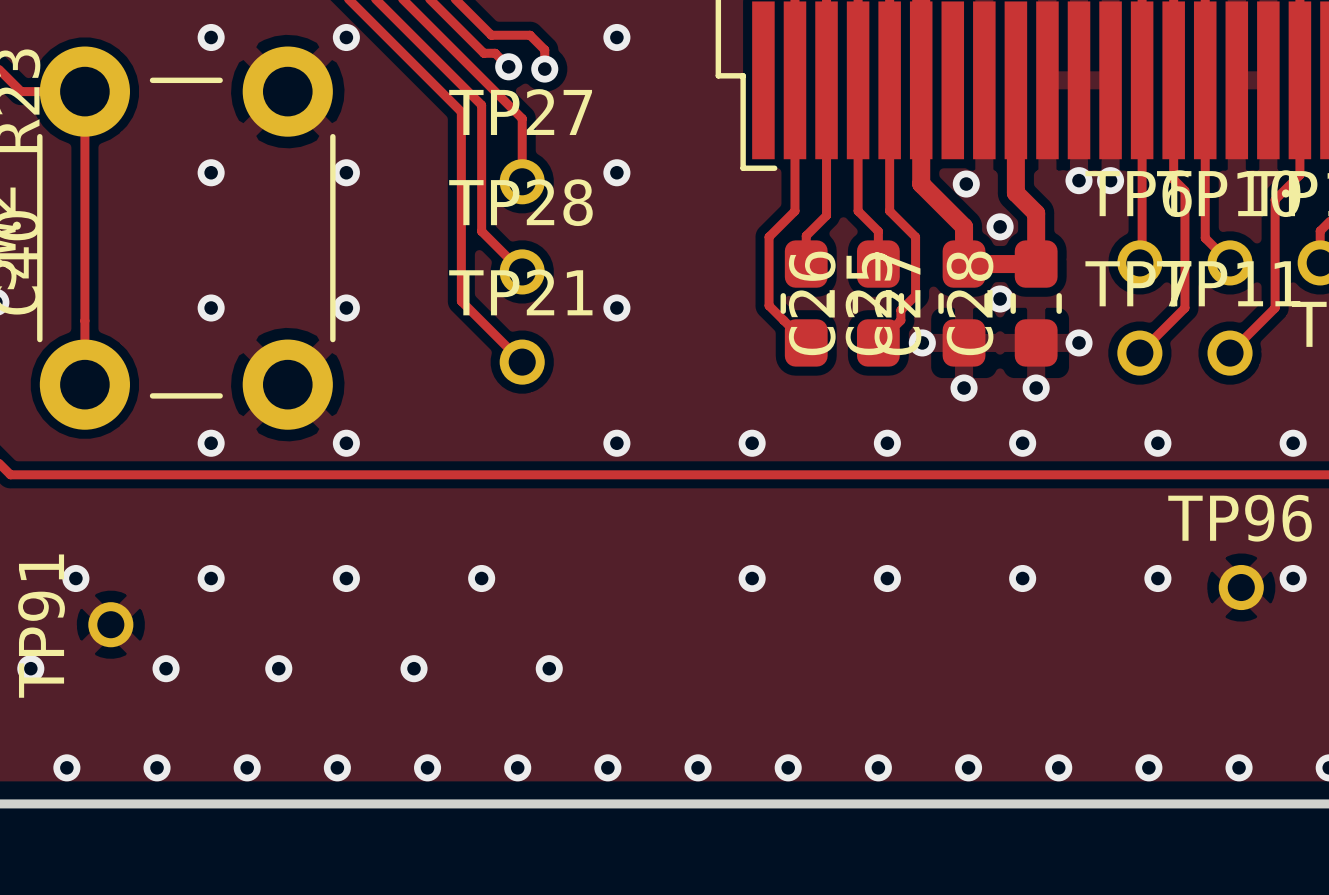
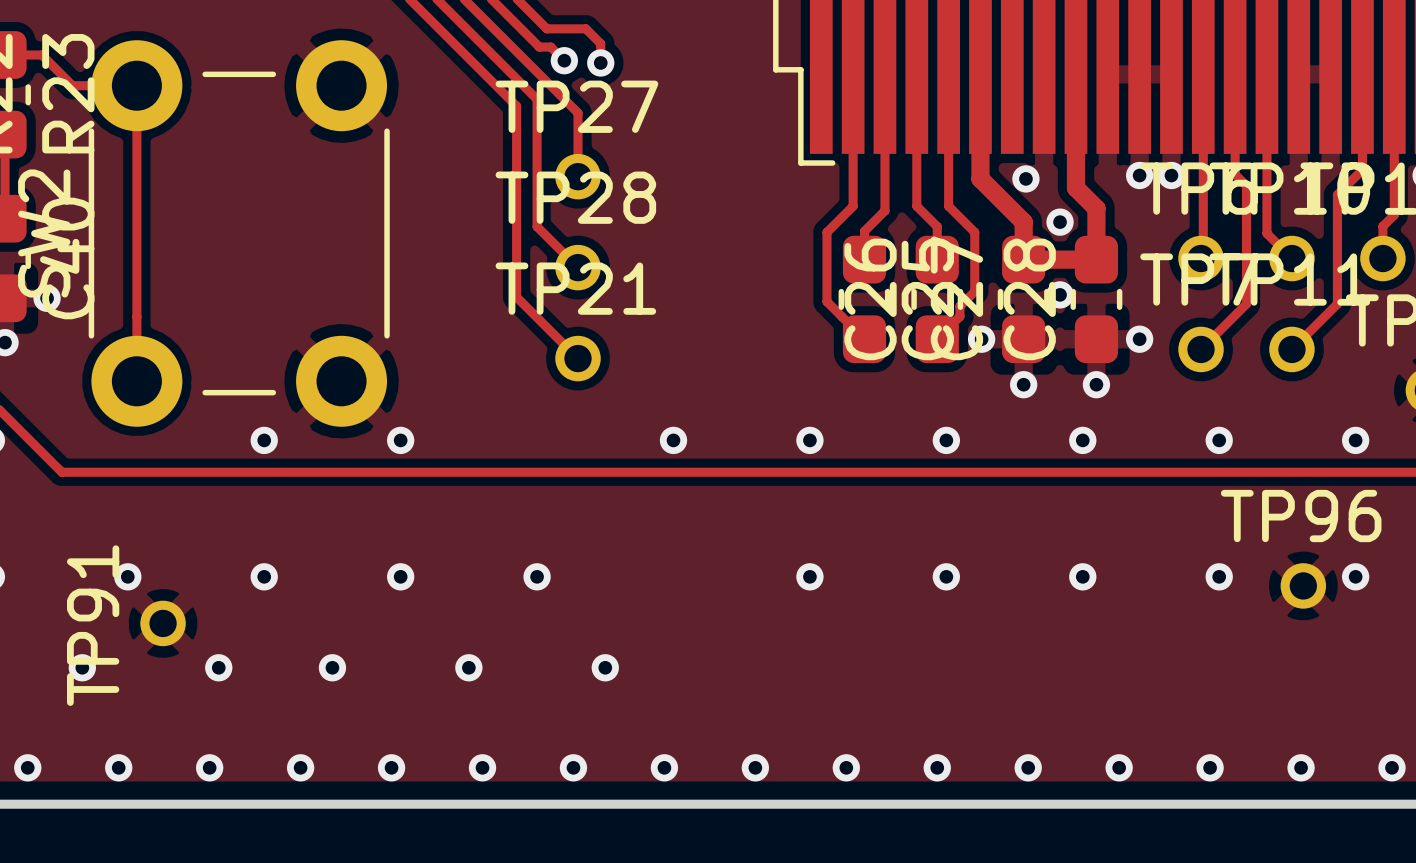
via: (211, 37) -> none
via: (346, 37) -> none
via: (616, 37) -> none
via: (211, 172) -> none
via: (346, 172) -> none
via: (616, 172) -> none
via: (211, 308) -> none
via: (346, 308) -> none
via: (616, 308) -> none

